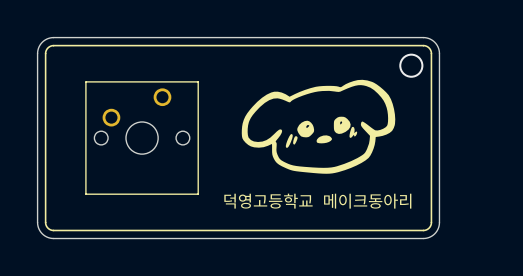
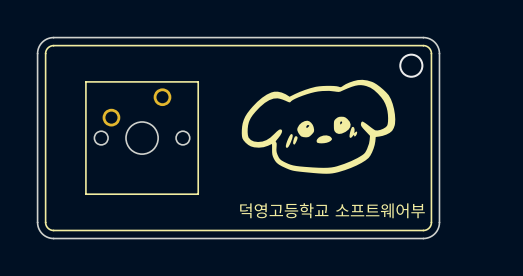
text: 덕영고등학교 메이크동아리 (317, 201) -> none
text: none -> 덕영고등학교 소프트웨어부 (332, 210)

